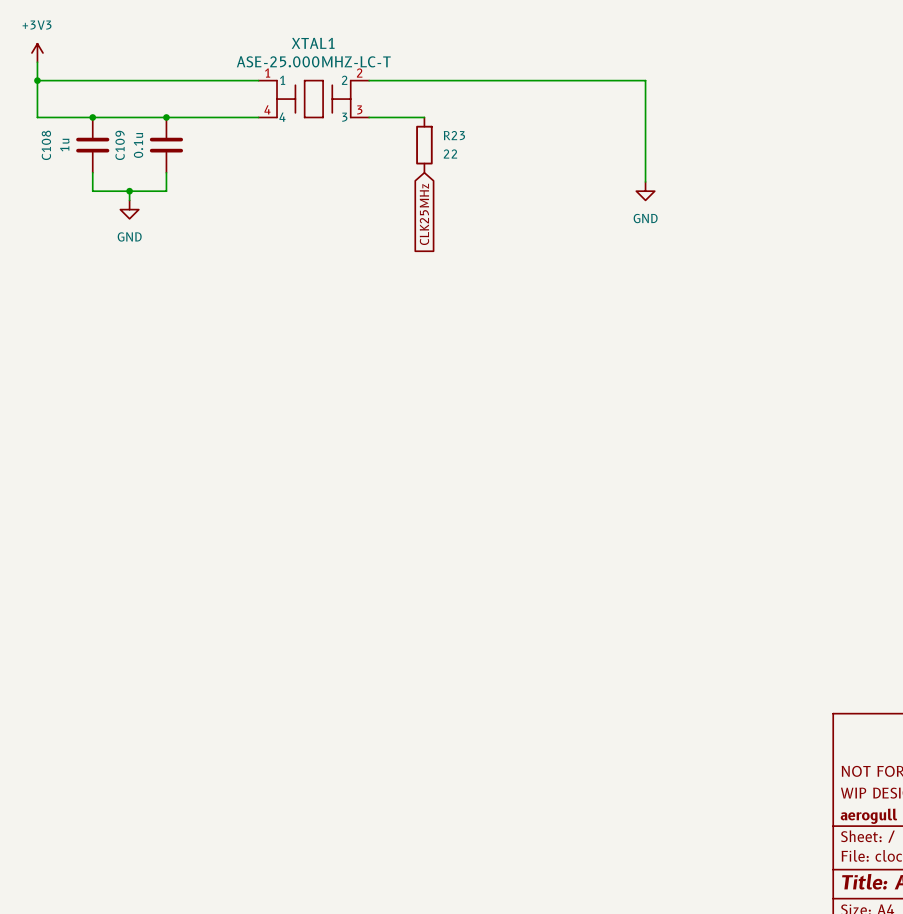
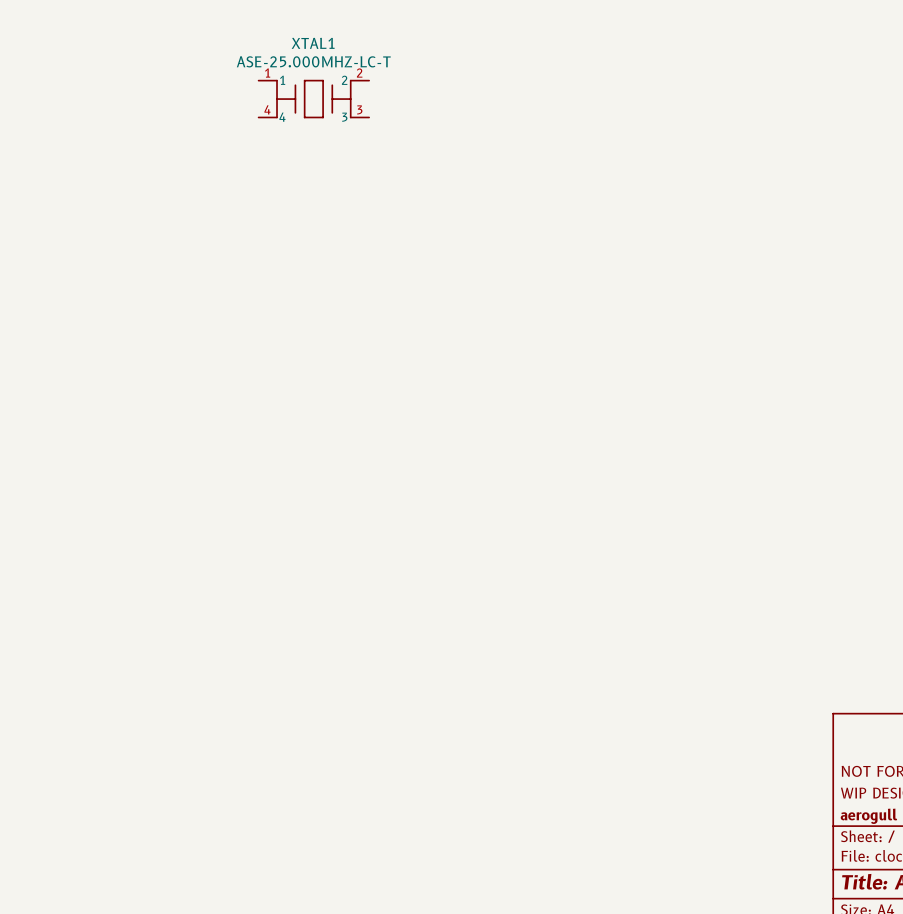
power symbol: +3V3 (37, 52) -> none
wire: (37, 62) (37, 117) (258, 117) -> none
wire: (37, 80) (258, 80) -> none
junction: (37, 80) -> none
wire: (369, 80) (645, 80) (645, 181) -> none
junction: (92, 117) -> none
junction: (166, 117) -> none
wire: (369, 117) (424, 117) -> none
C108: 1u (92, 145) -> none
C109: 0.1u (166, 145) -> none
R23: 22 (424, 145) -> none
wire: (92, 172) (92, 191) (166, 191) (166, 172) -> none
wire: (129, 191) (129, 200) -> none
junction: (129, 191) -> none
power symbol: GND (645, 191) -> none
power symbol: GND (129, 209) -> none
global label: CLK25MHz (424, 214) -> none

